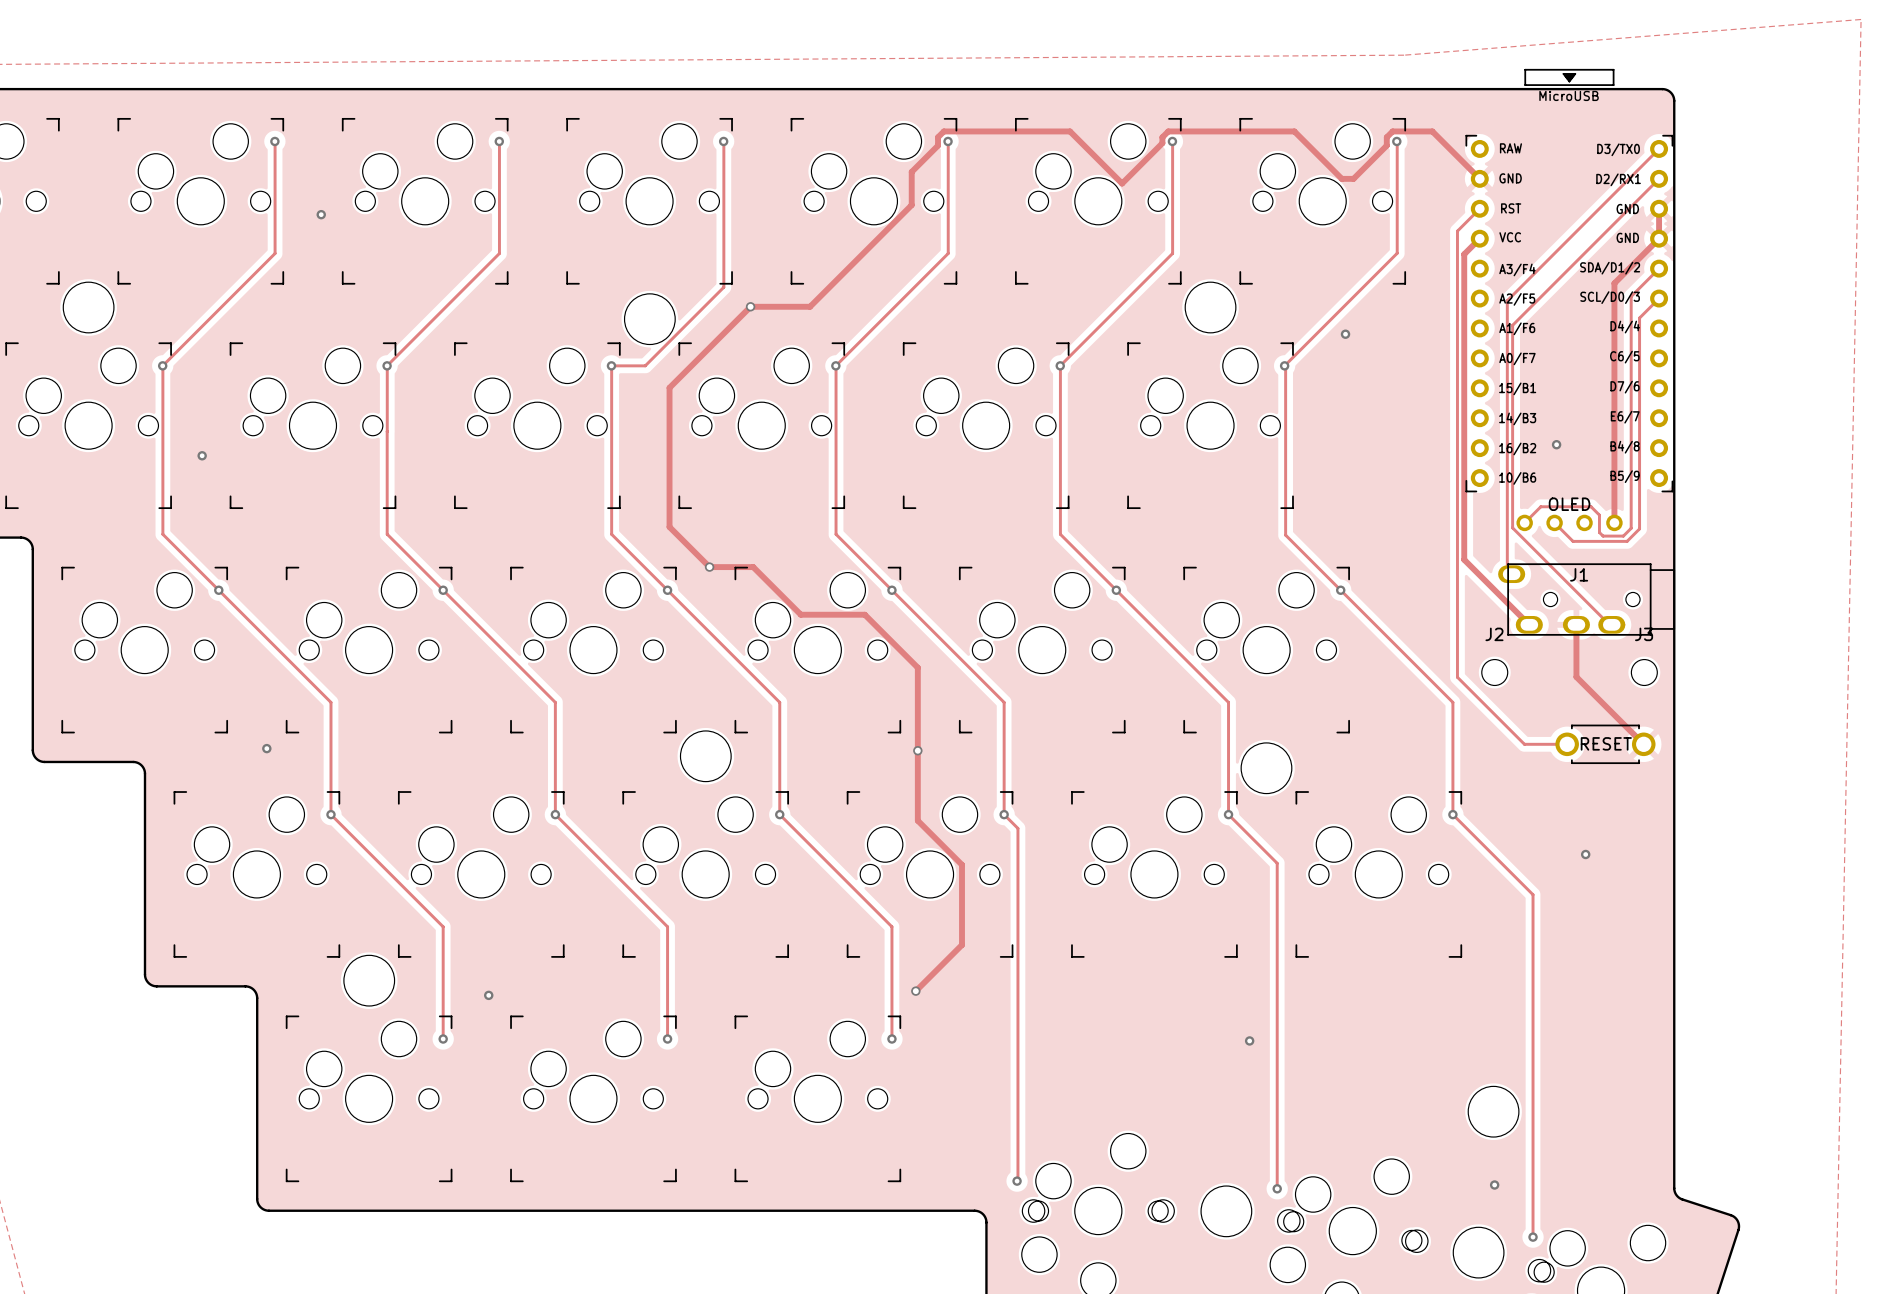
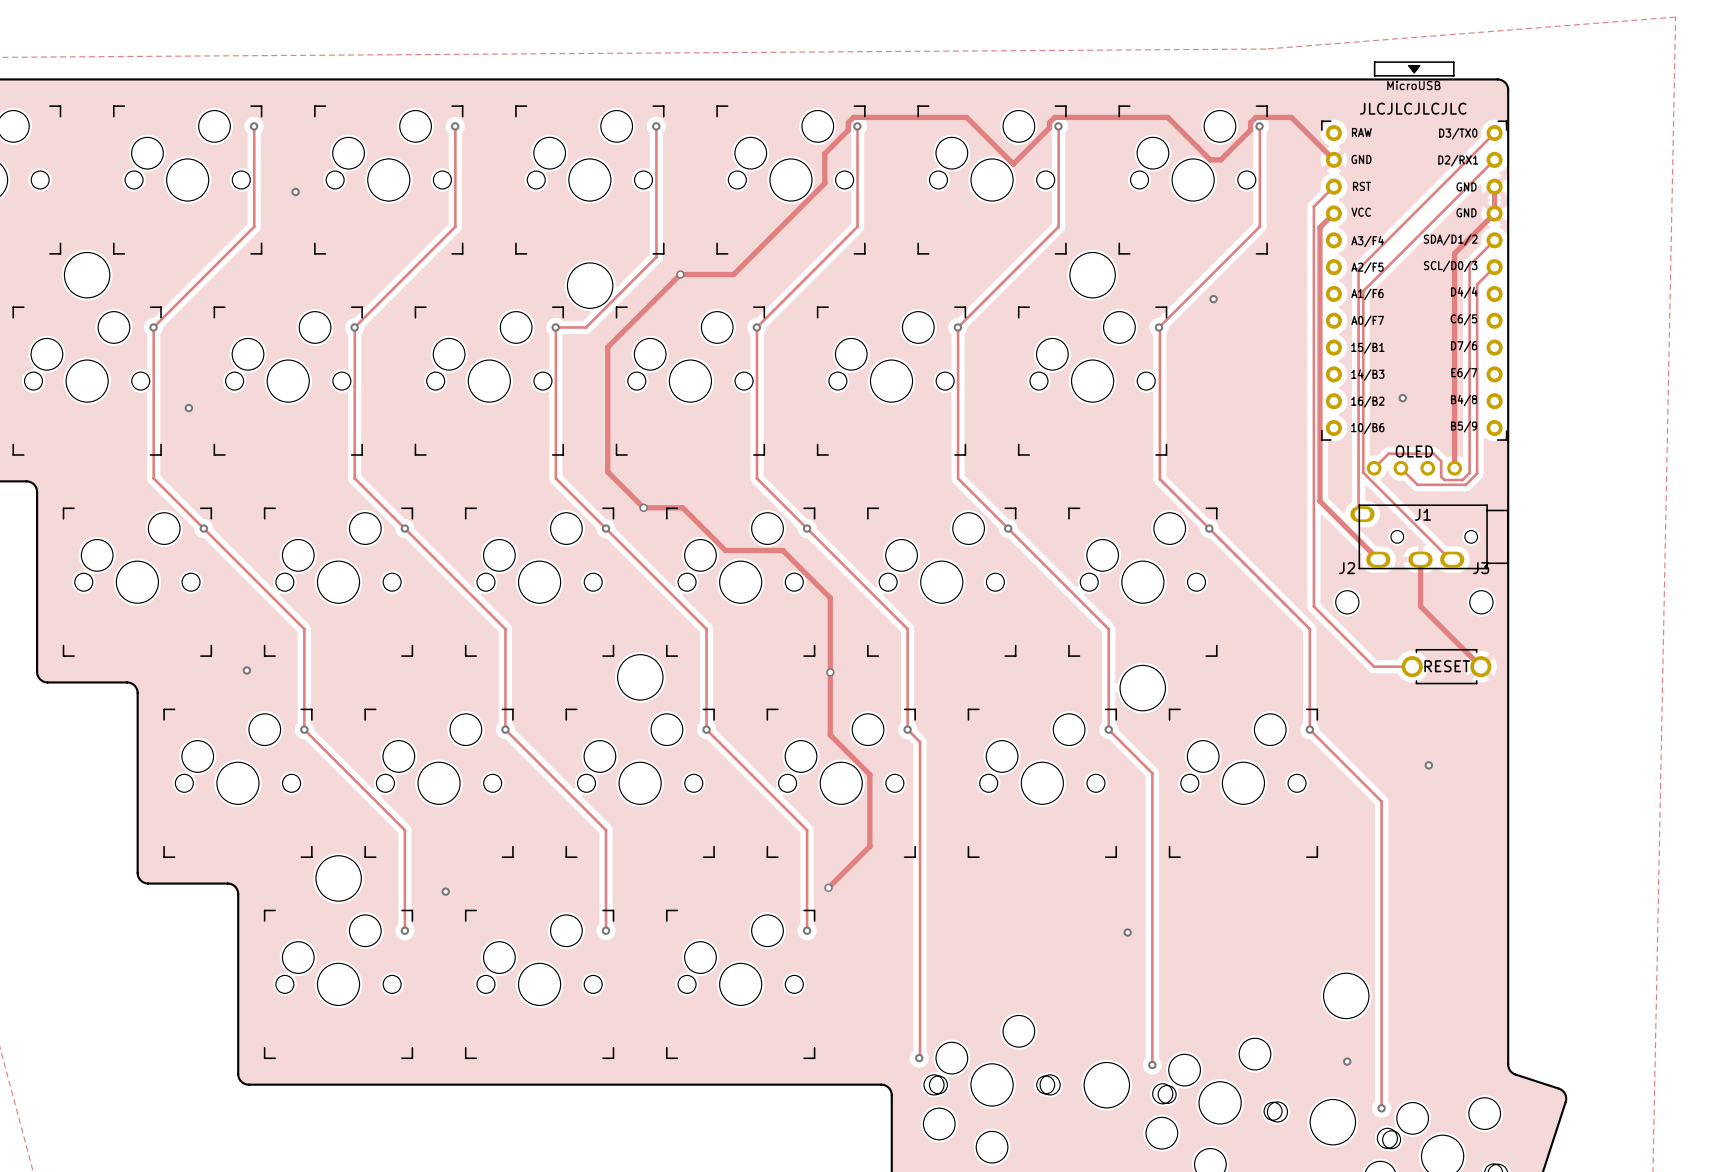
text: none -> JLCJLCJLCJLC (1413, 108)

